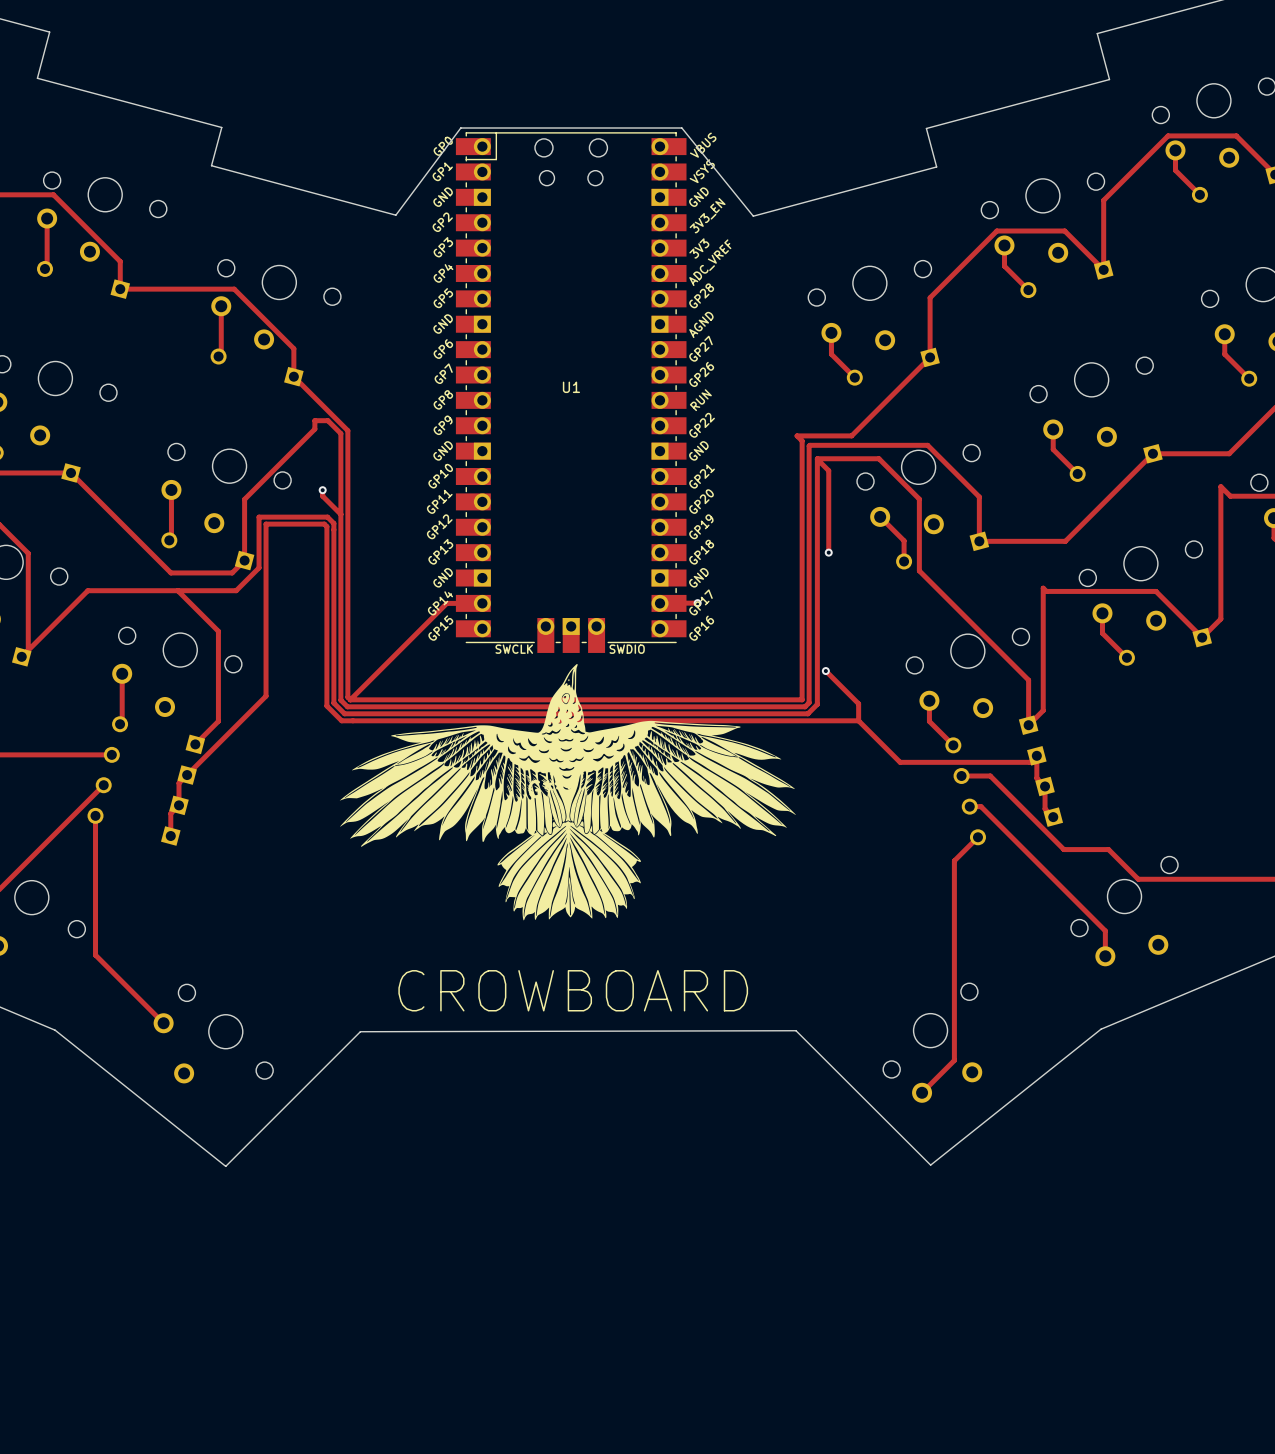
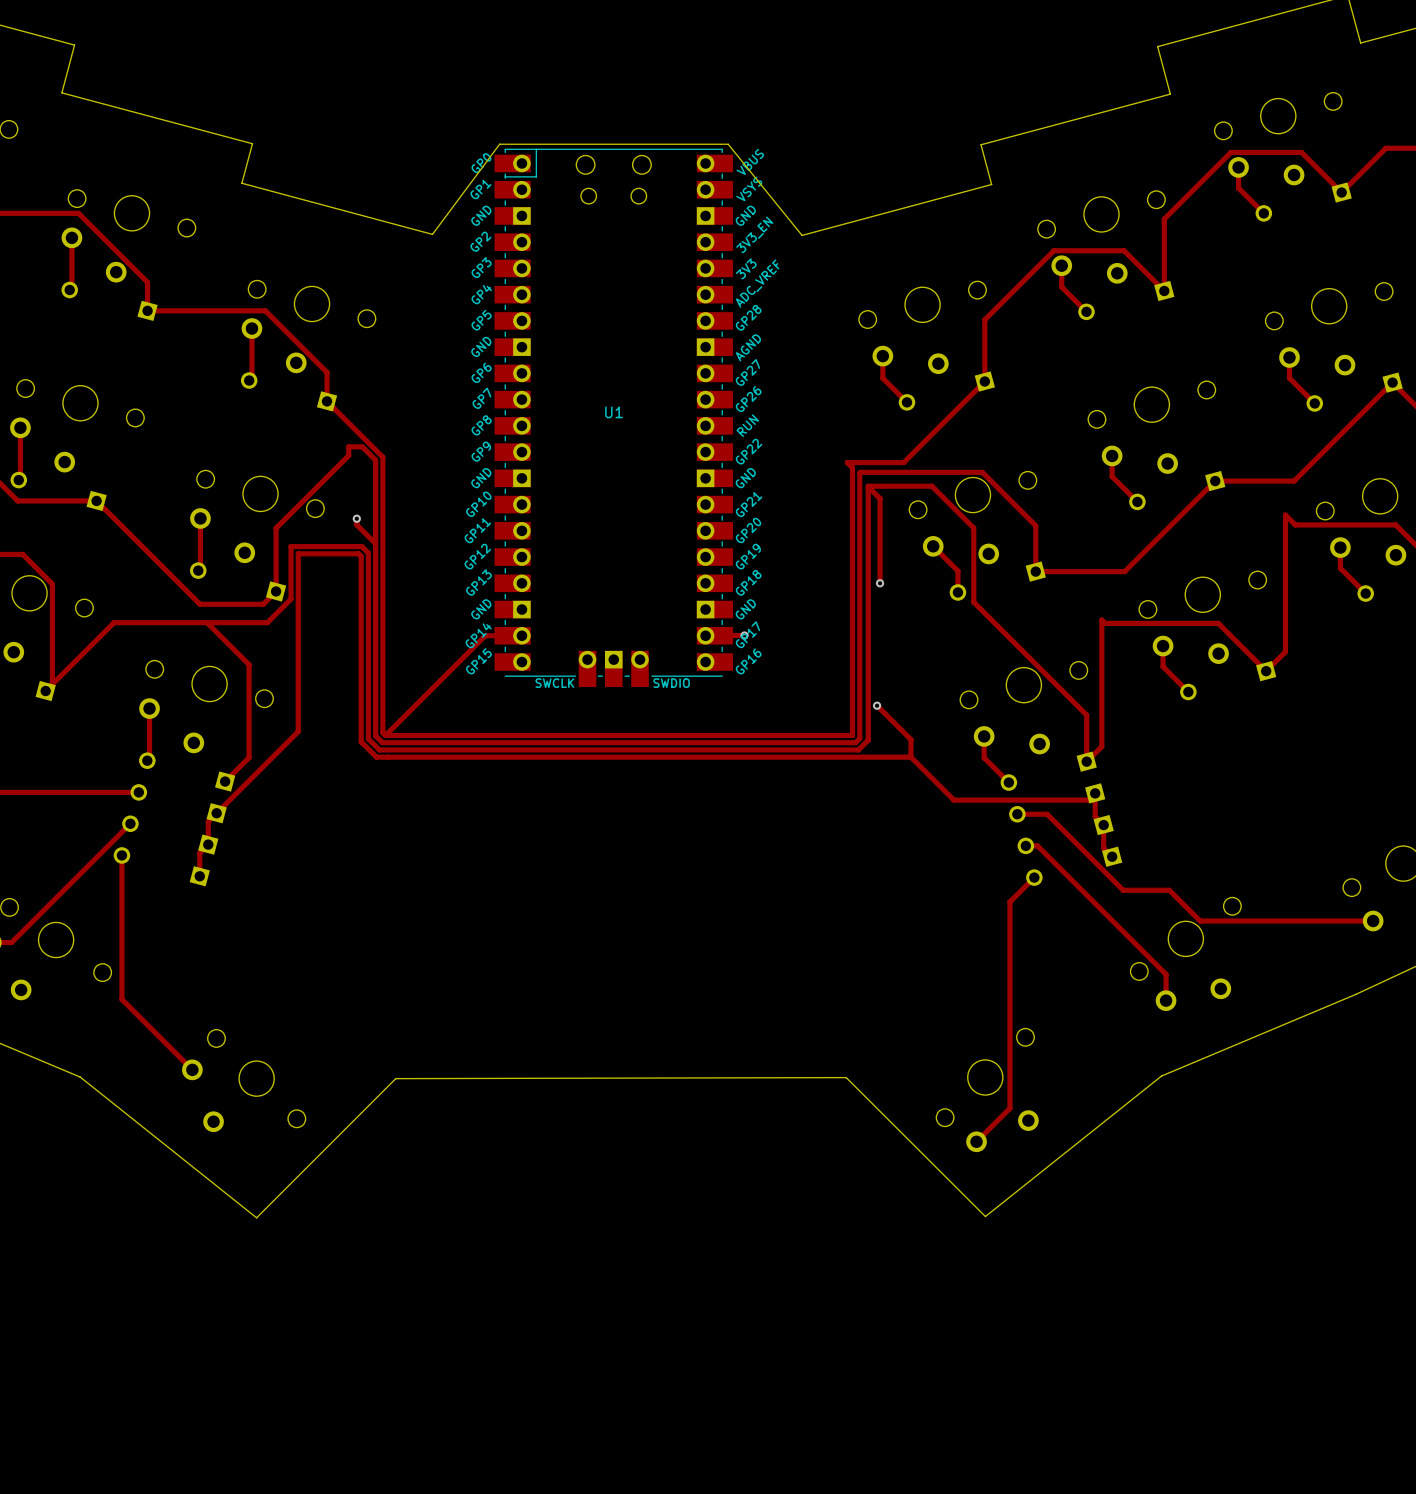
part: (567, 792) -> none
text: CROWBOARD (573, 990) -> none

